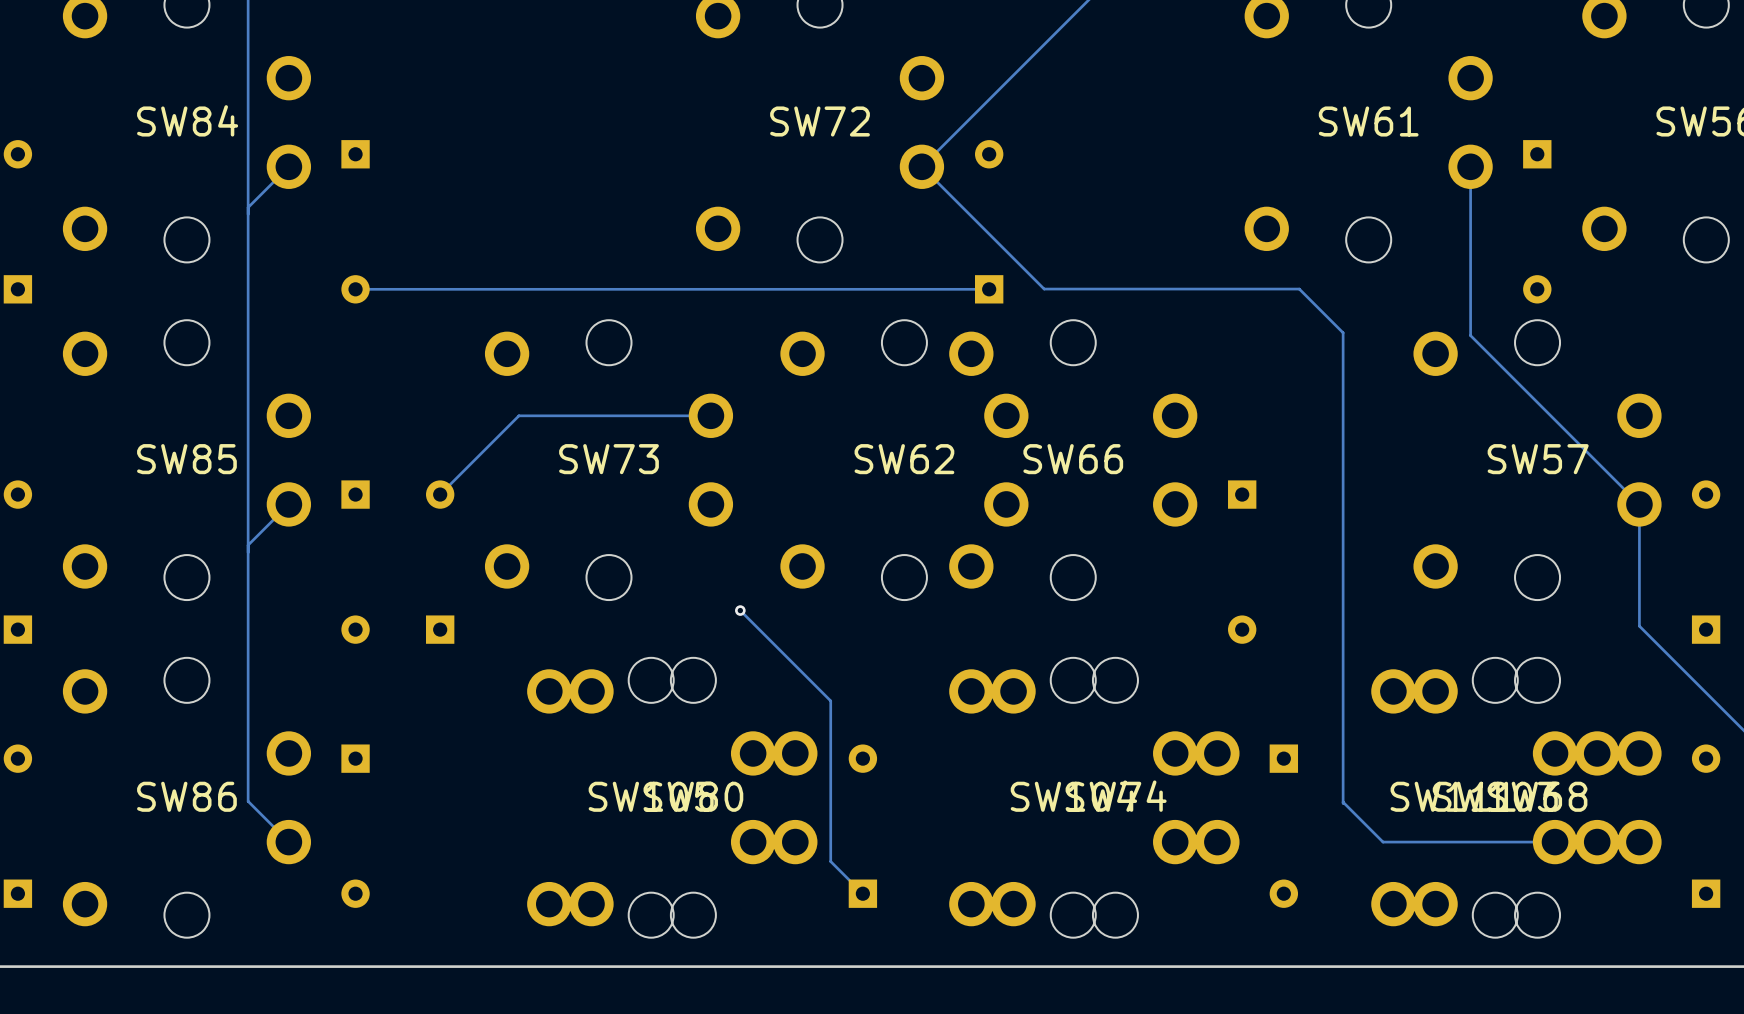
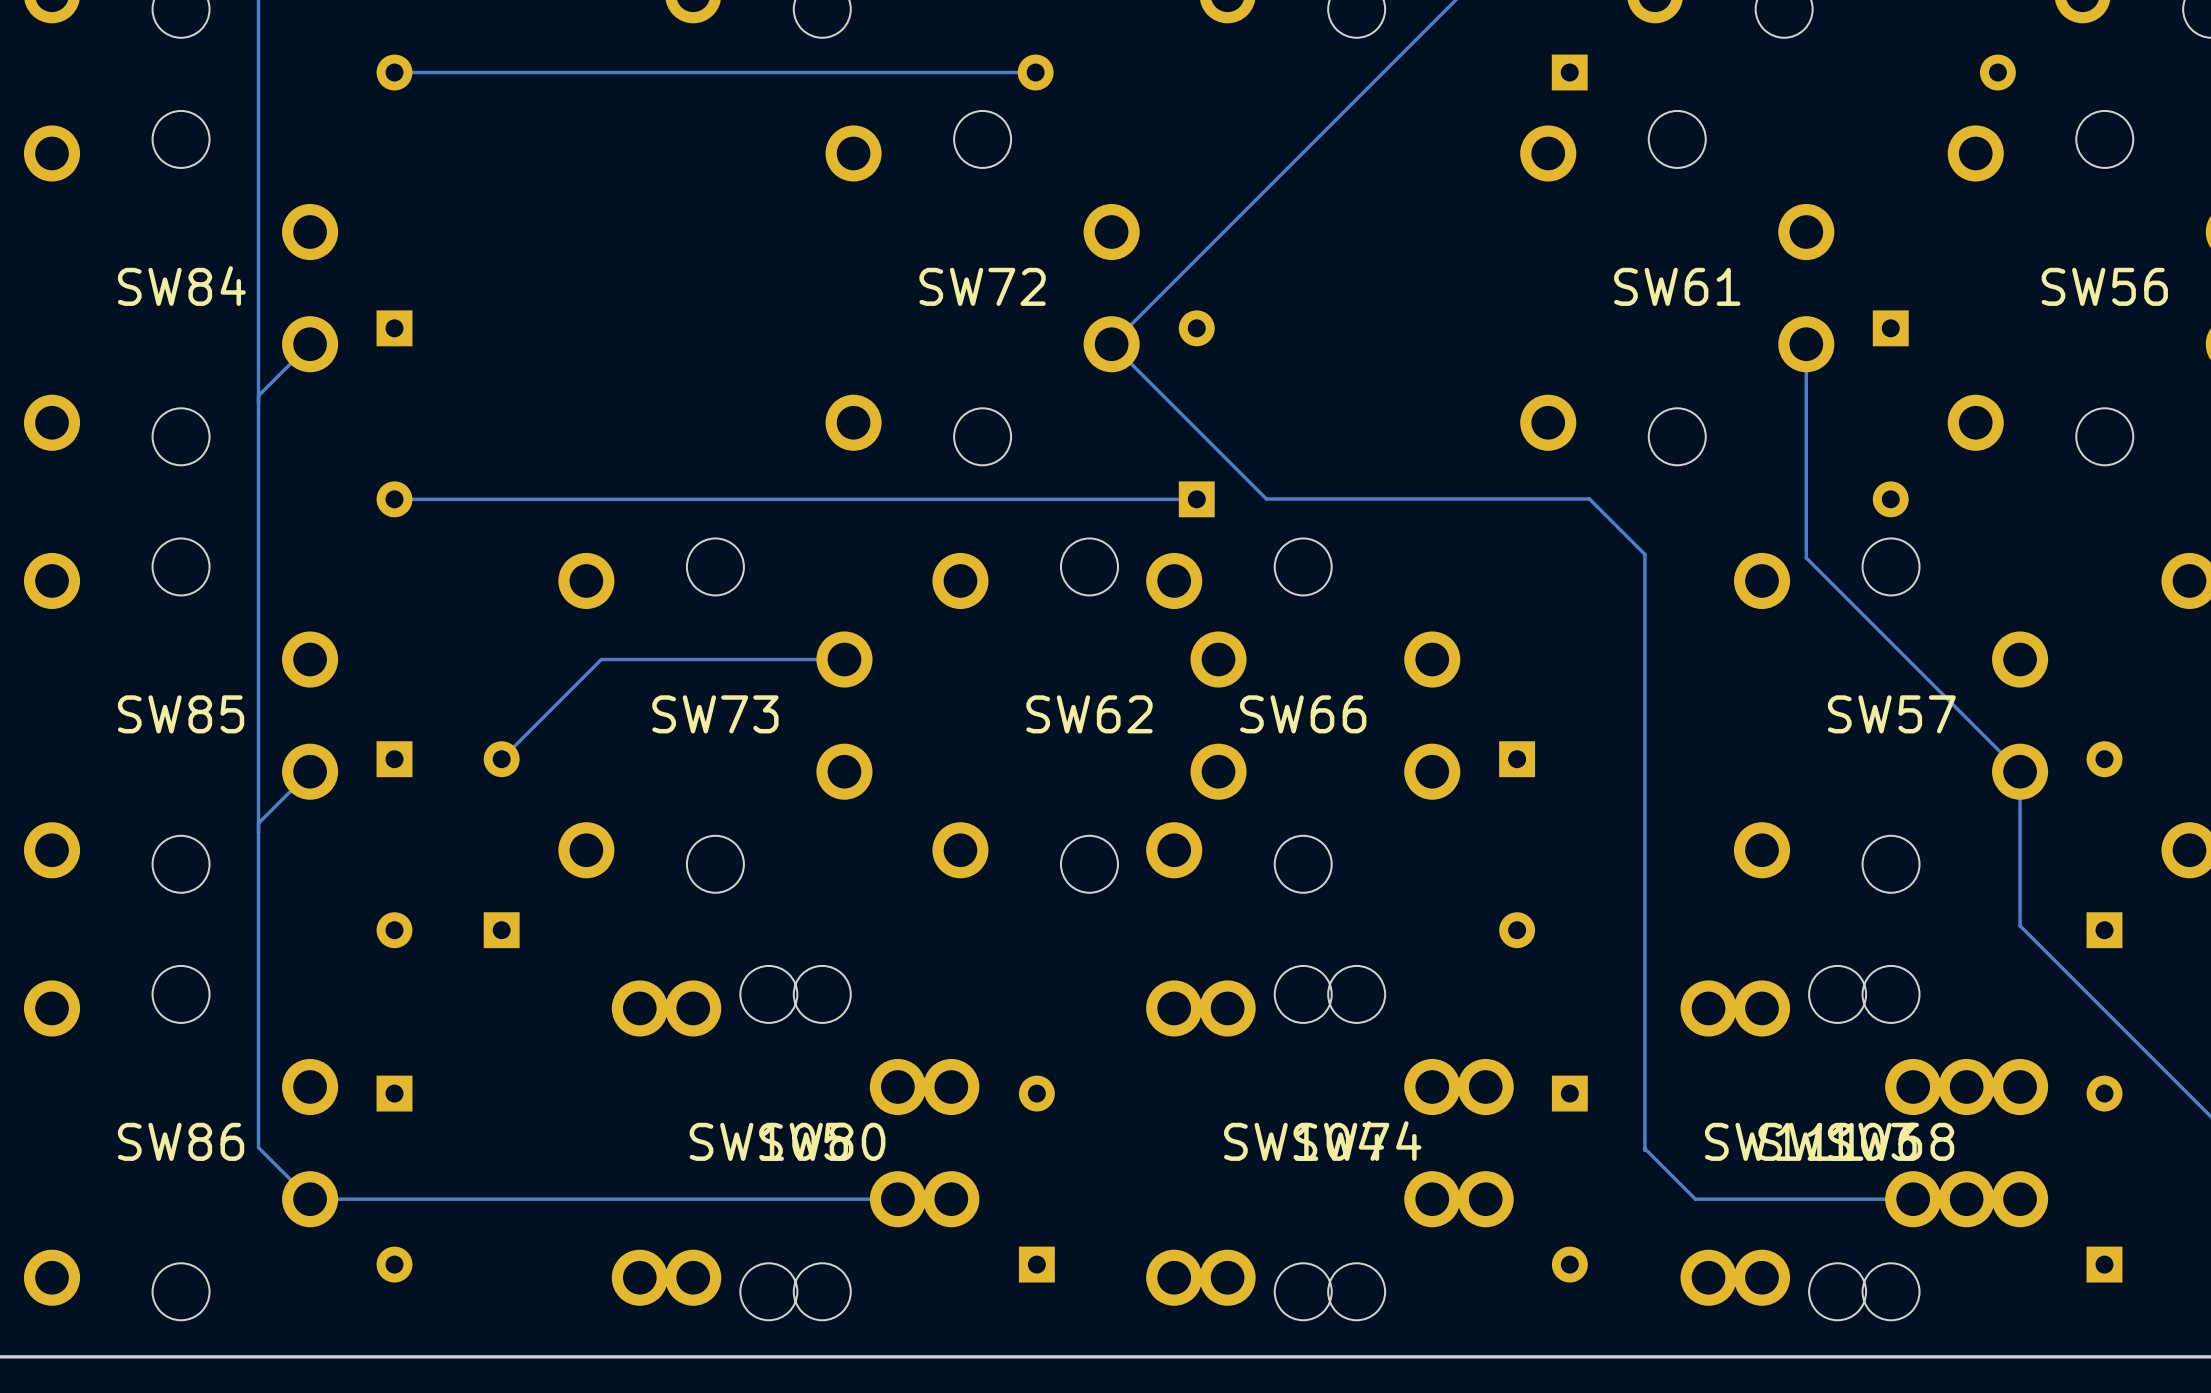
track: (740, 610) (830, 700) (830, 861) (862, 893) -> none
via: (740, 610) -> none
track: none -> (897, 1199) (310, 1199)

